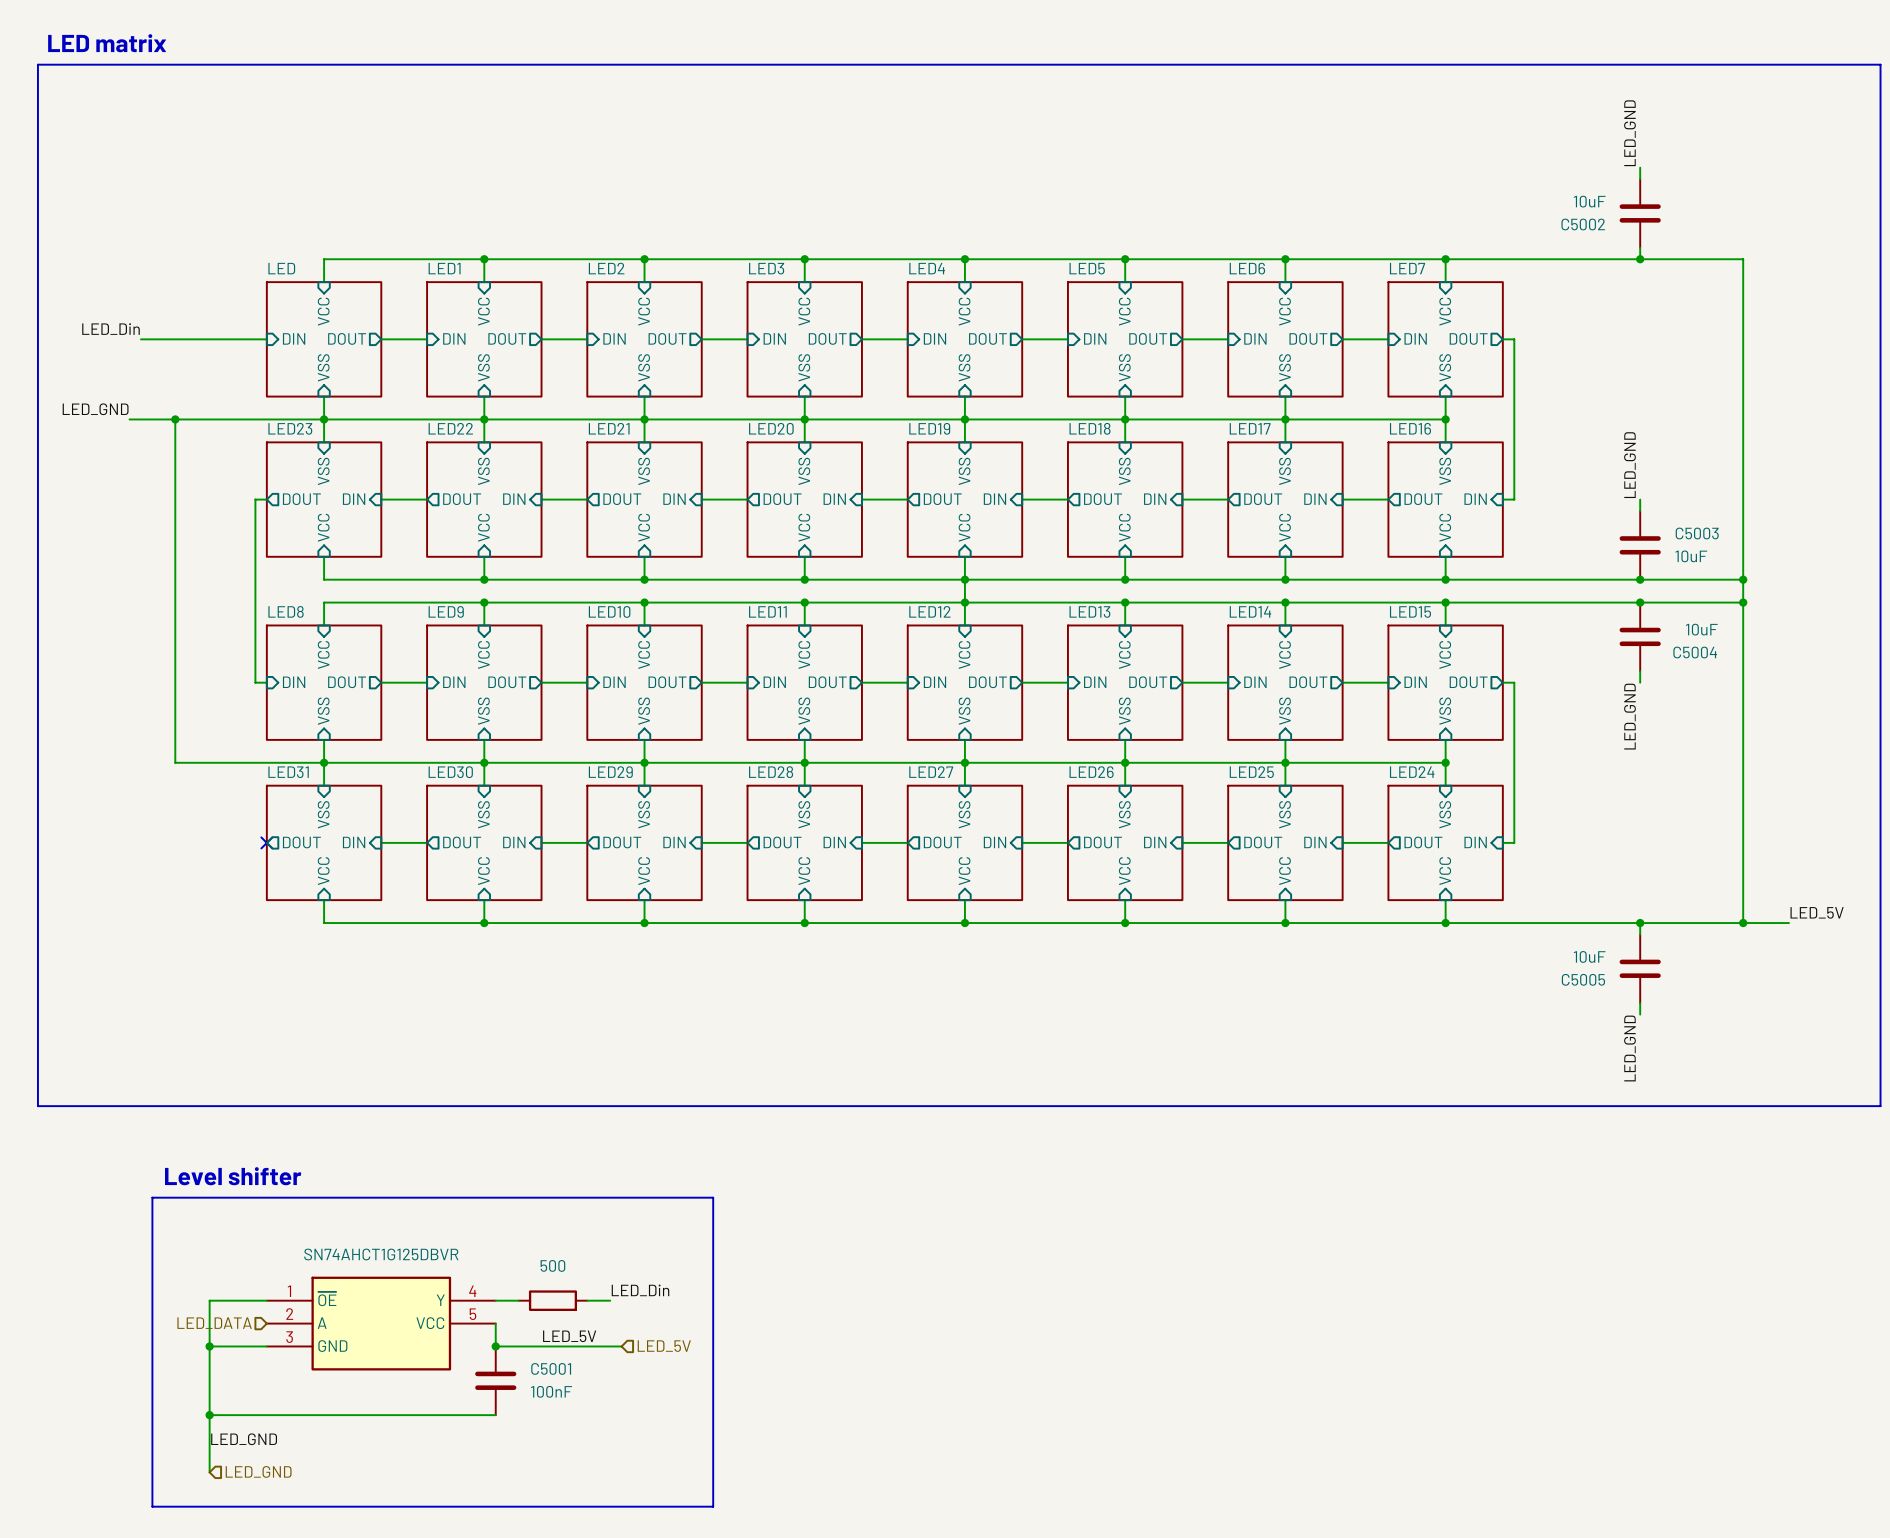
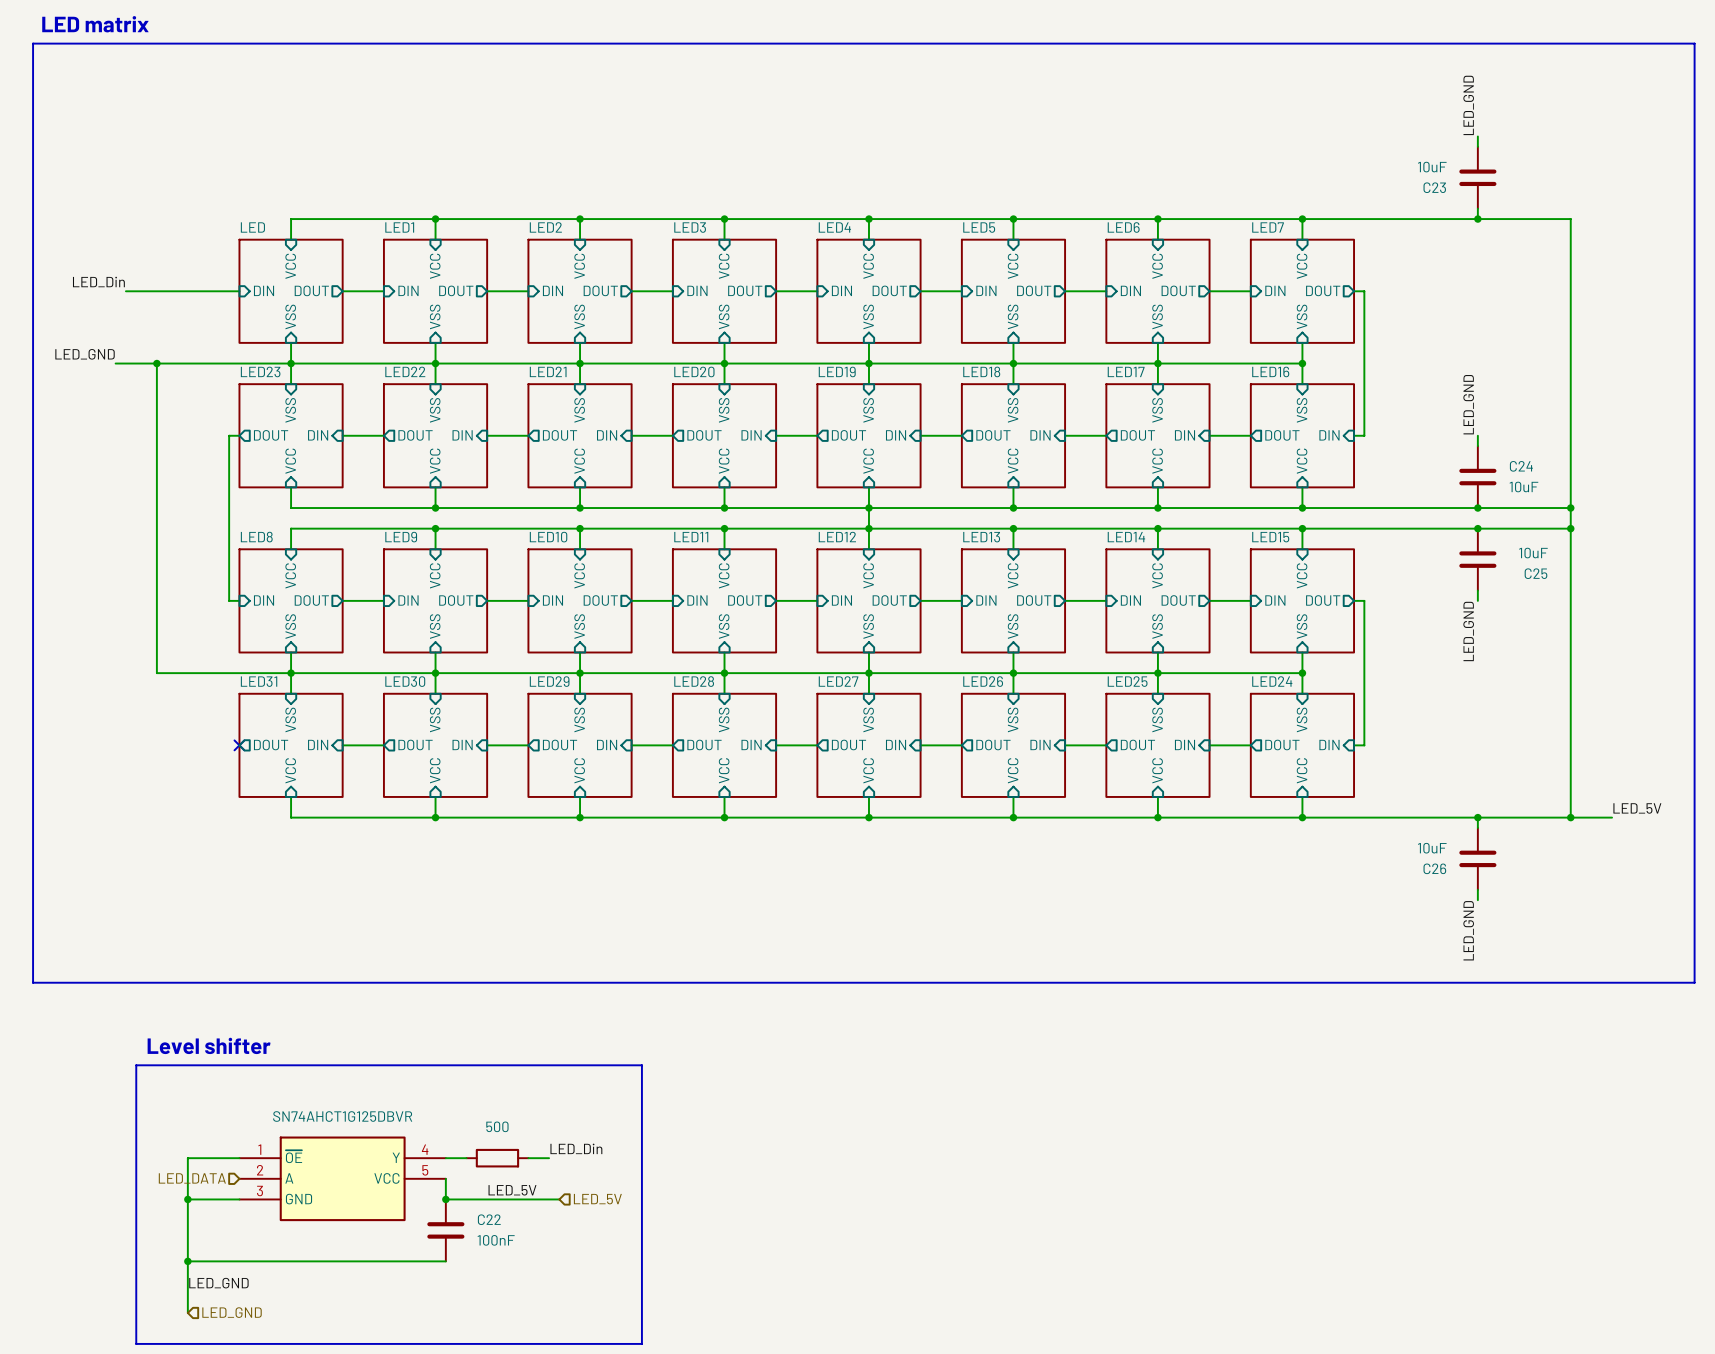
C5002 name: C5002 (1583, 224) -> C23 (1434, 187)
C5003 name: C5003 (1697, 533) -> C24 (1521, 466)
C5004 name: C5004 (1695, 652) -> C25 (1535, 573)
C5005 name: C5005 (1583, 979) -> C26 (1434, 868)
C5001 name: C5001 (551, 1368) -> C22 (489, 1219)

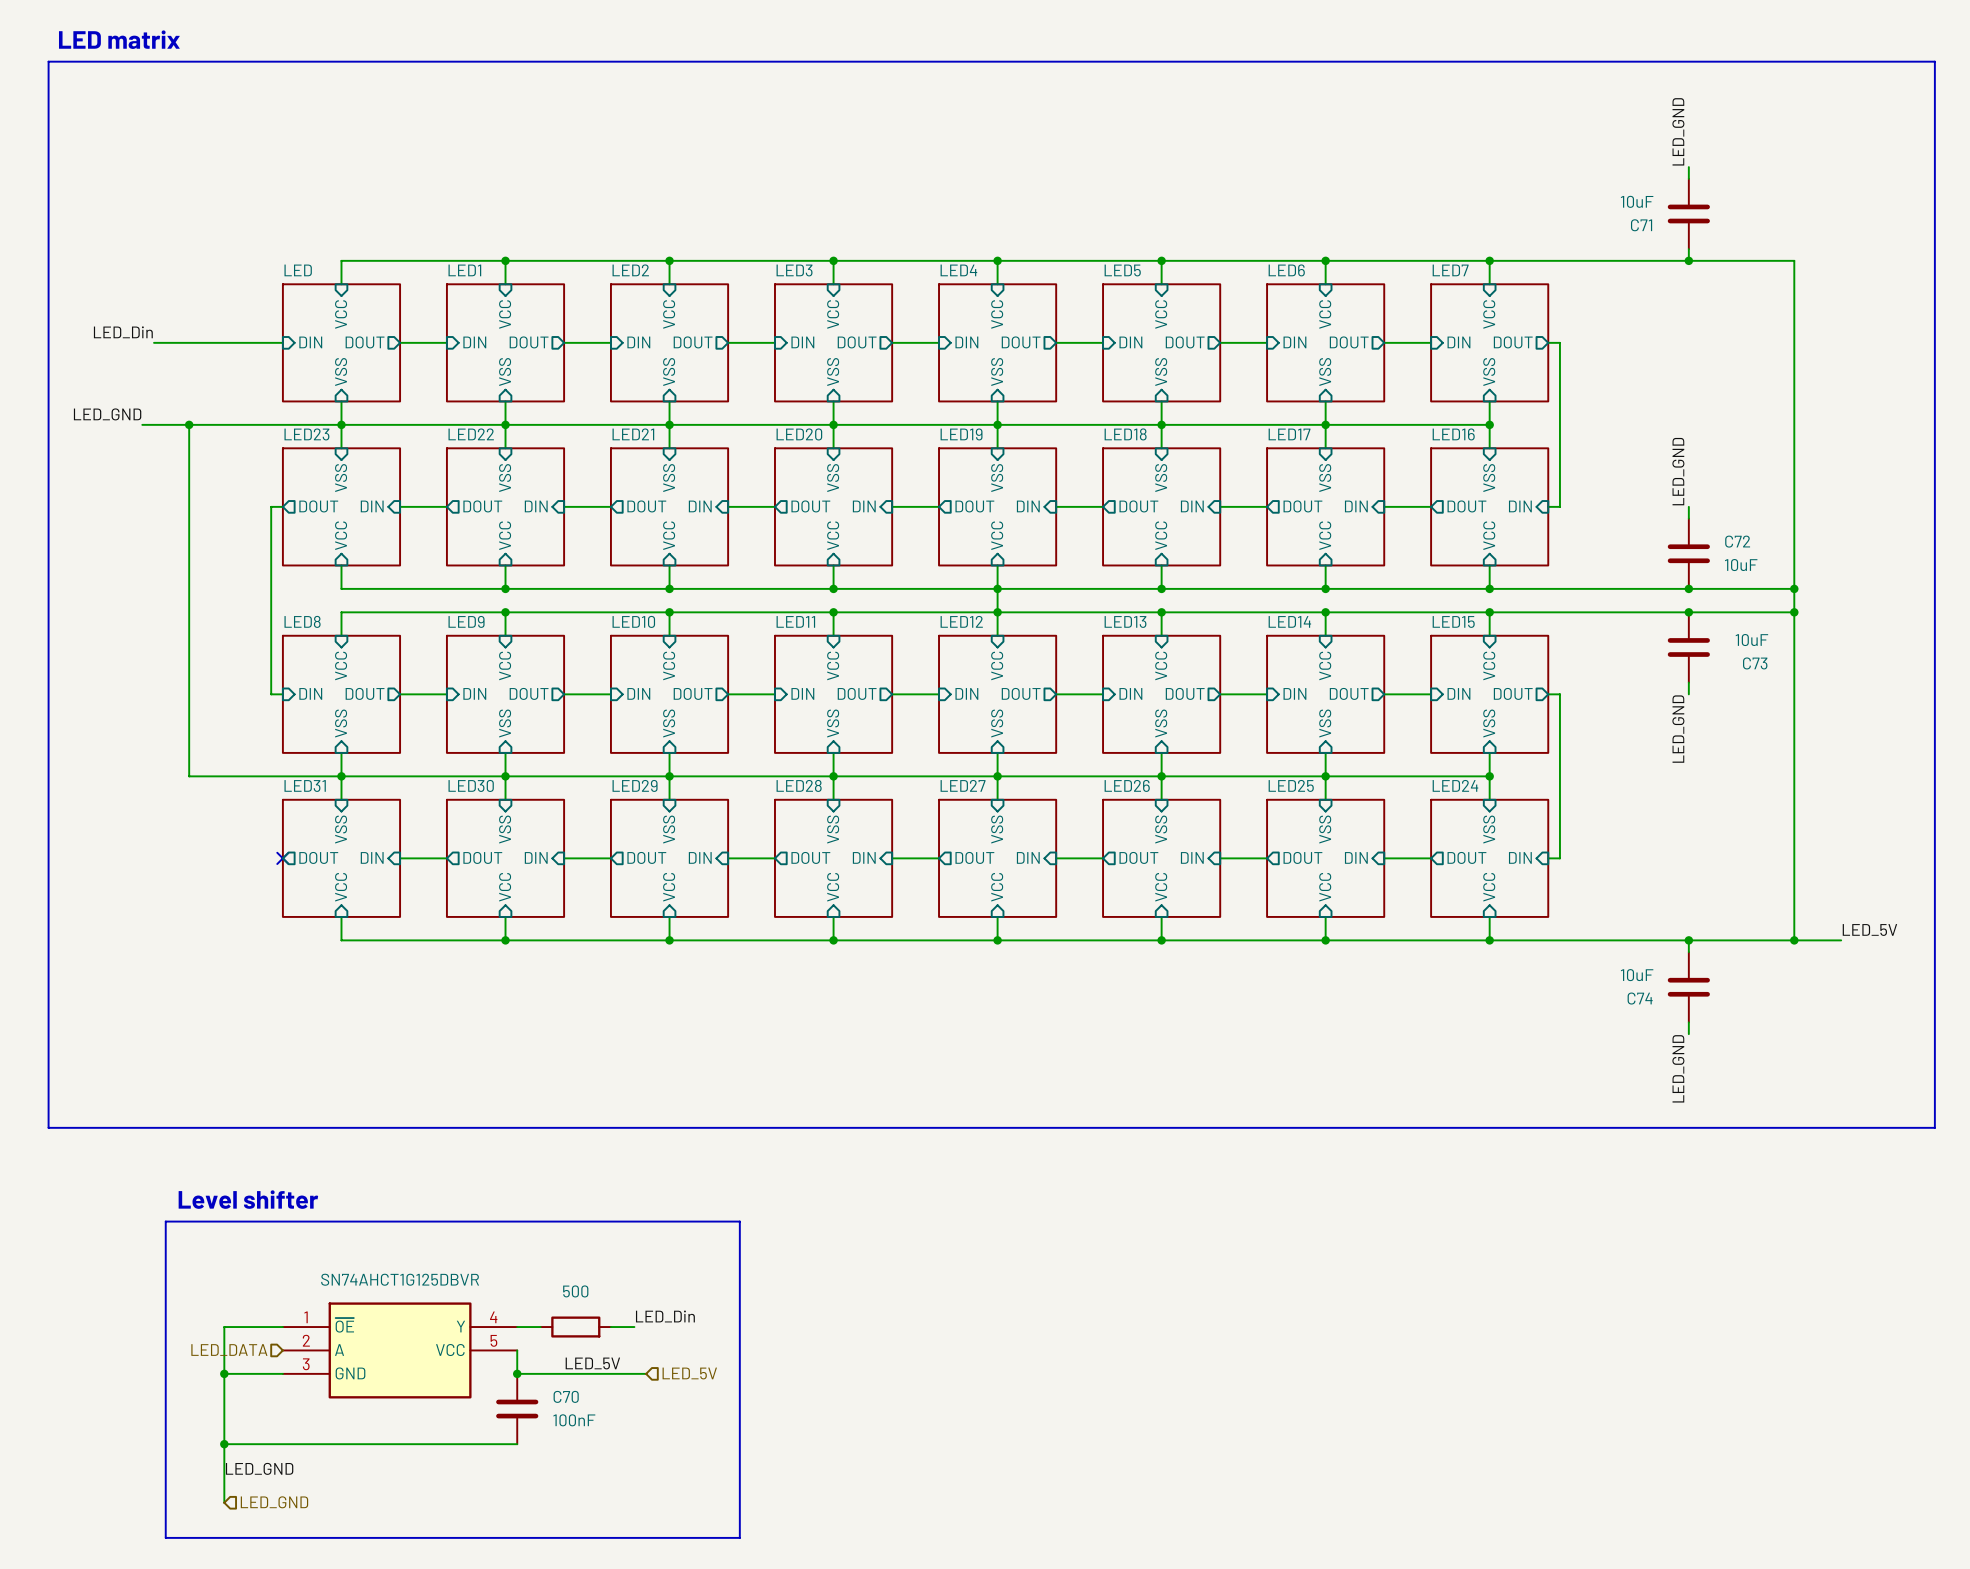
C23 name: C23 (1434, 187) -> C71 (1641, 225)
C24 name: C24 (1521, 466) -> C72 (1737, 541)
C25 name: C25 (1535, 573) -> C73 (1755, 663)
C26 name: C26 (1434, 868) -> C74 (1640, 998)
C22 name: C22 (489, 1219) -> C70 (566, 1396)

